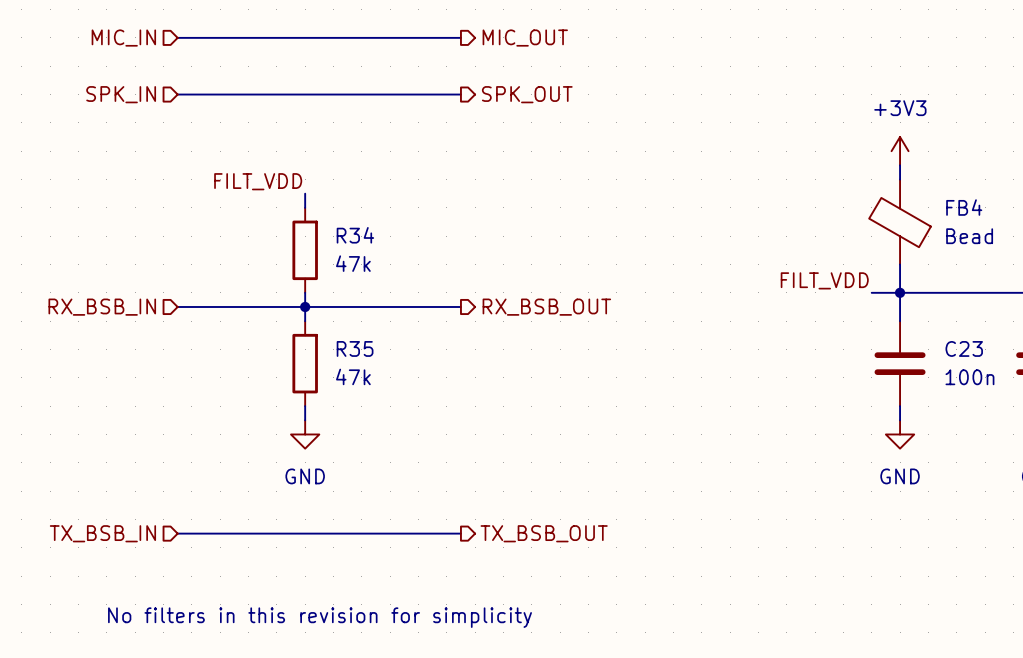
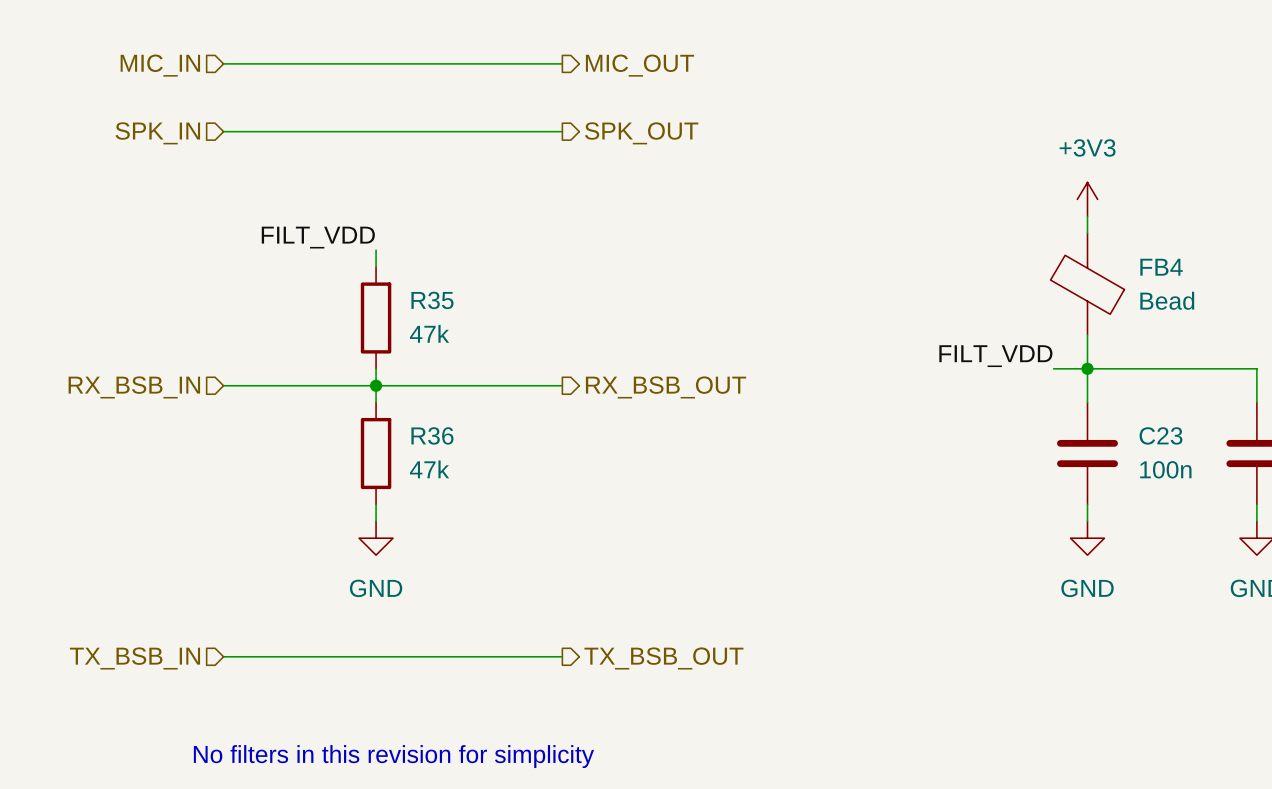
R34 name: R34 (355, 235) -> R35 (432, 300)
R35 name: R35 (355, 348) -> R36 (432, 435)

